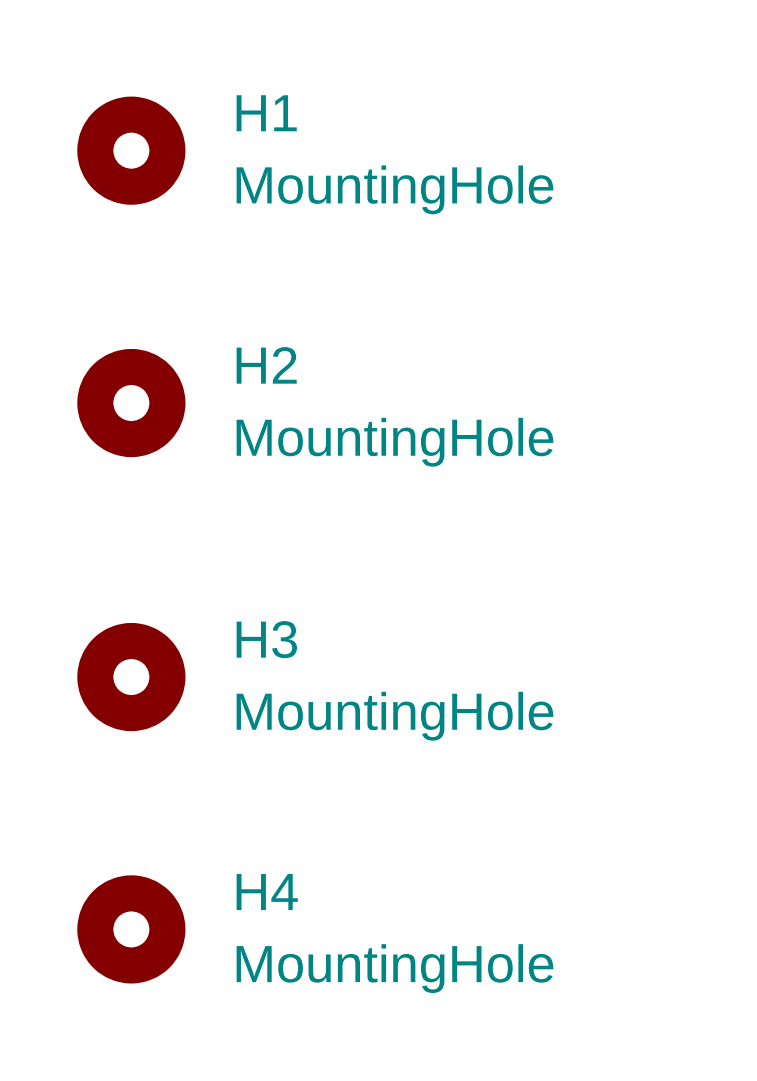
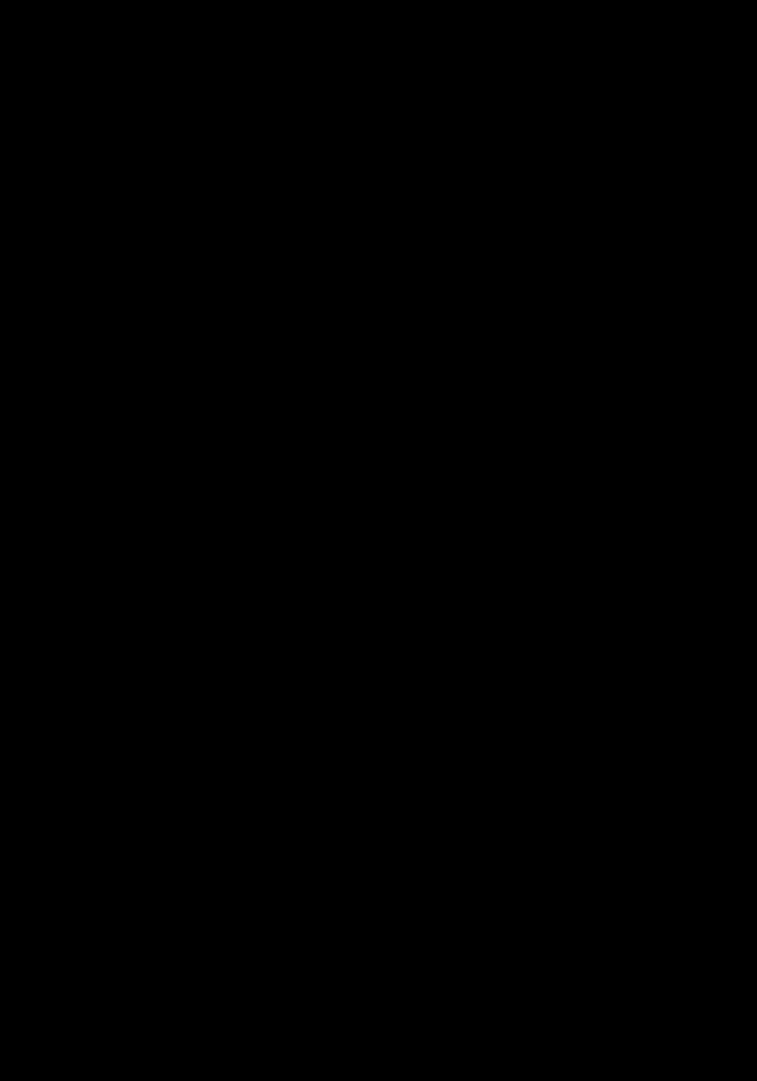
H1: MountingHole (131, 150) -> none
H2: MountingHole (131, 403) -> none
H3: MountingHole (131, 677) -> none
H4: MountingHole (131, 929) -> none

